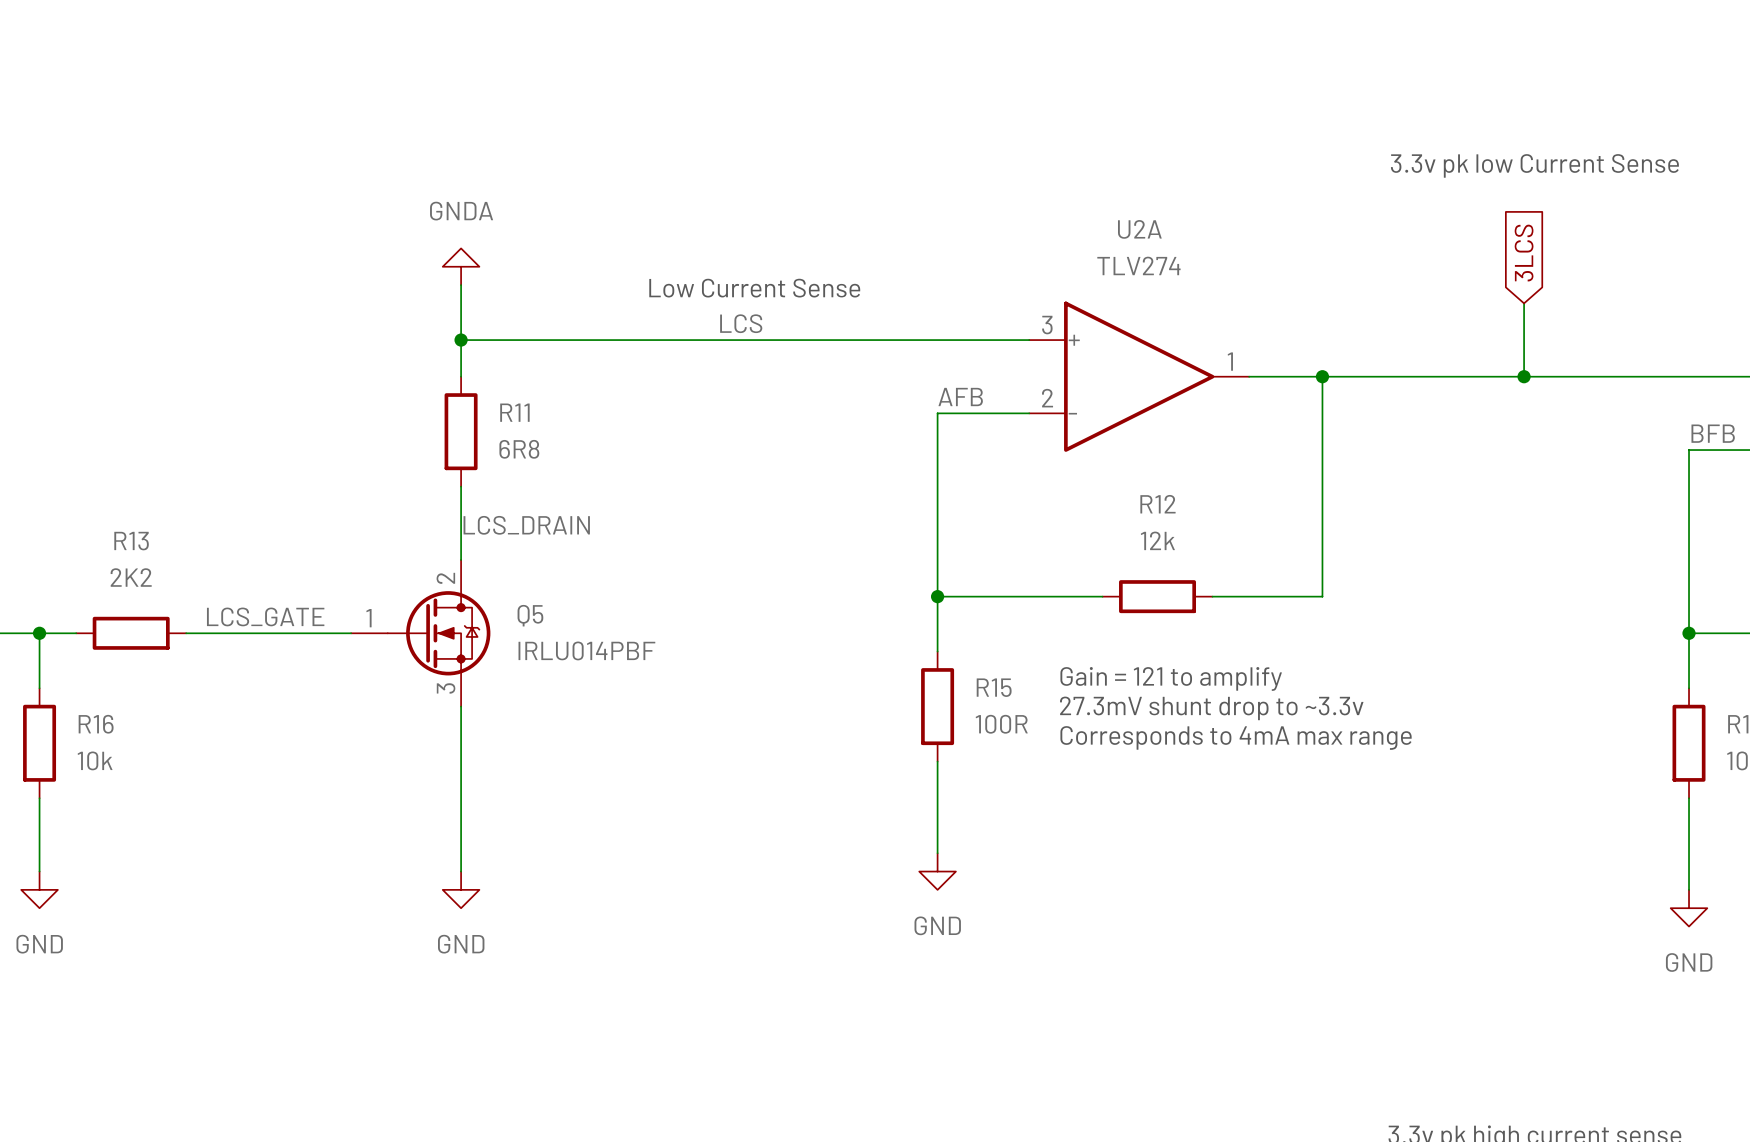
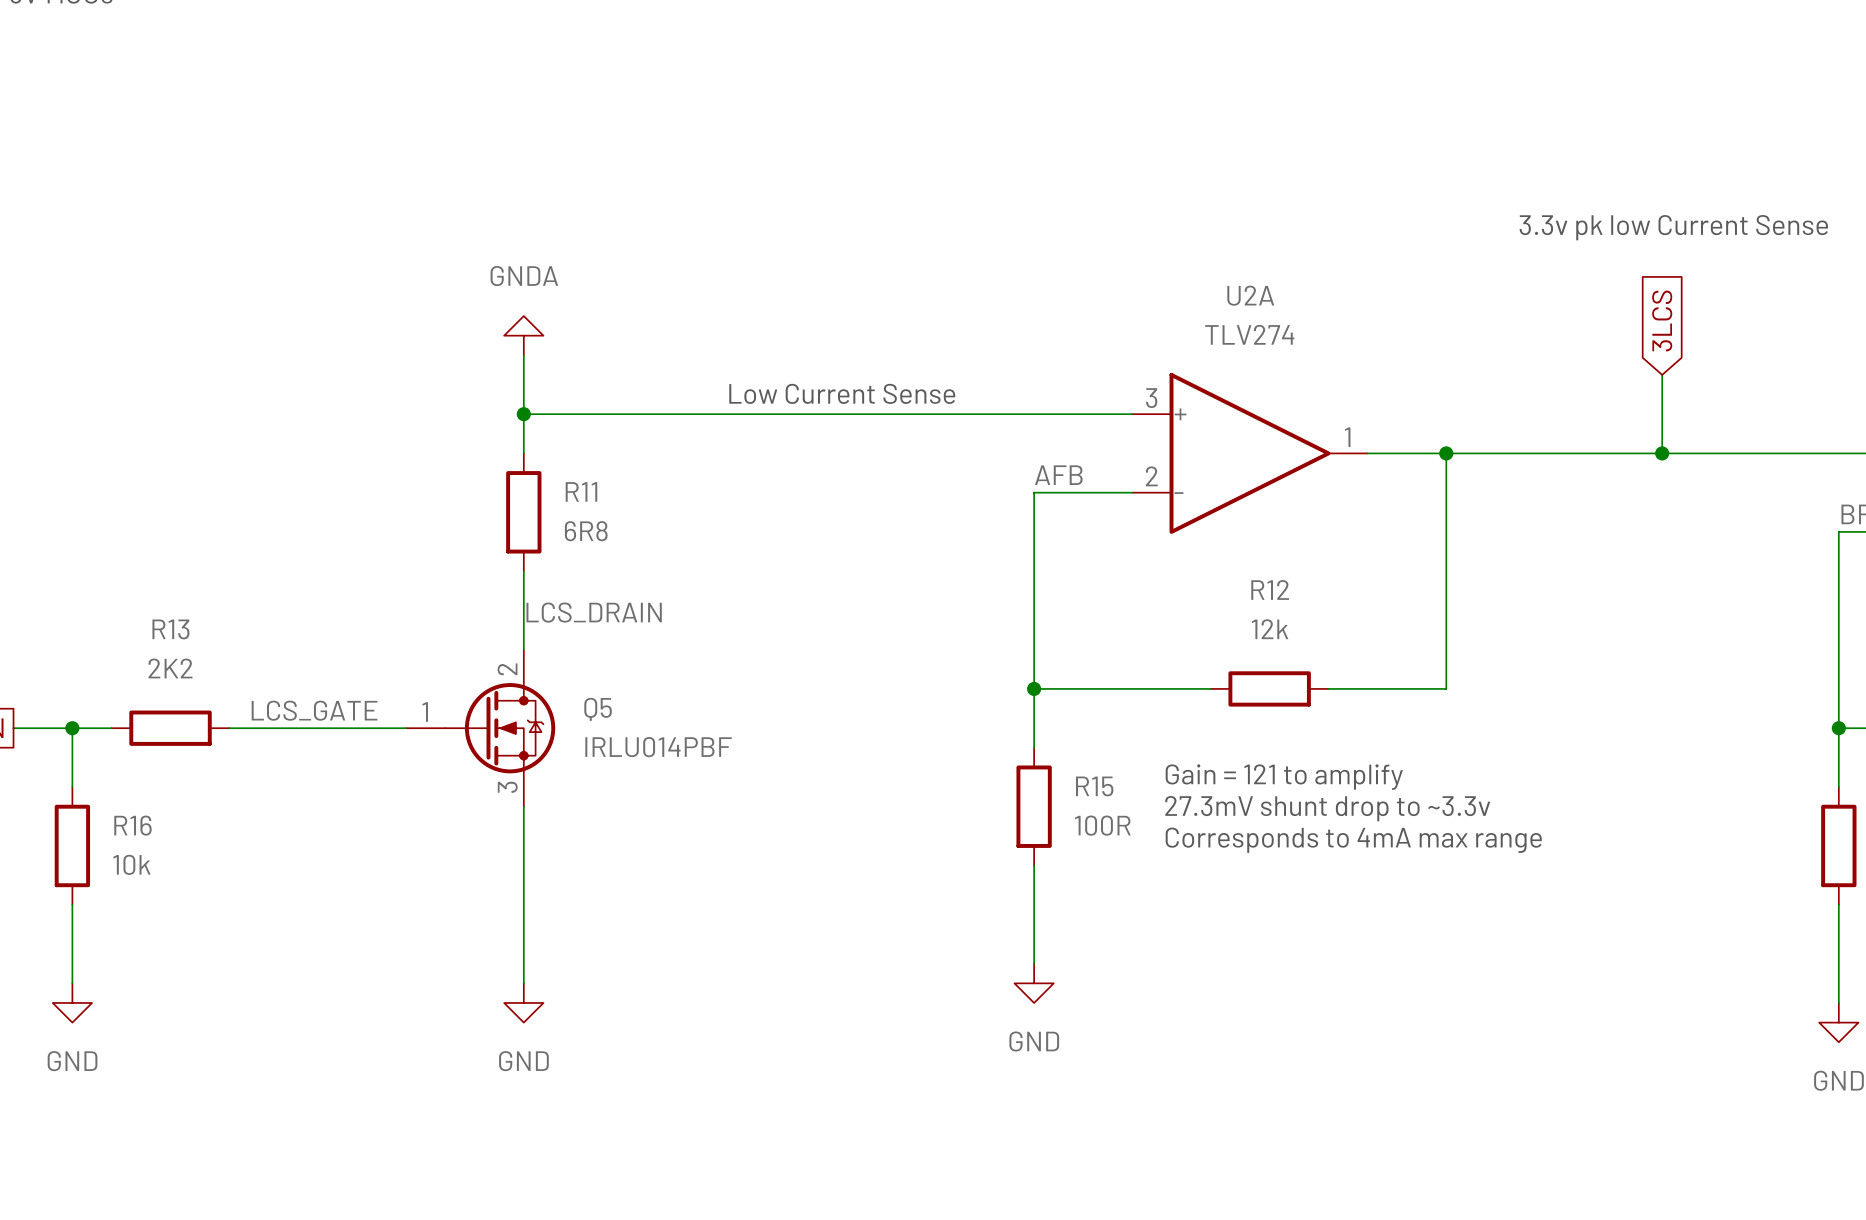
text position: Low Current Sense (754, 288) -> Low Current Sense (842, 393)
label: LCS (741, 323) -> none

